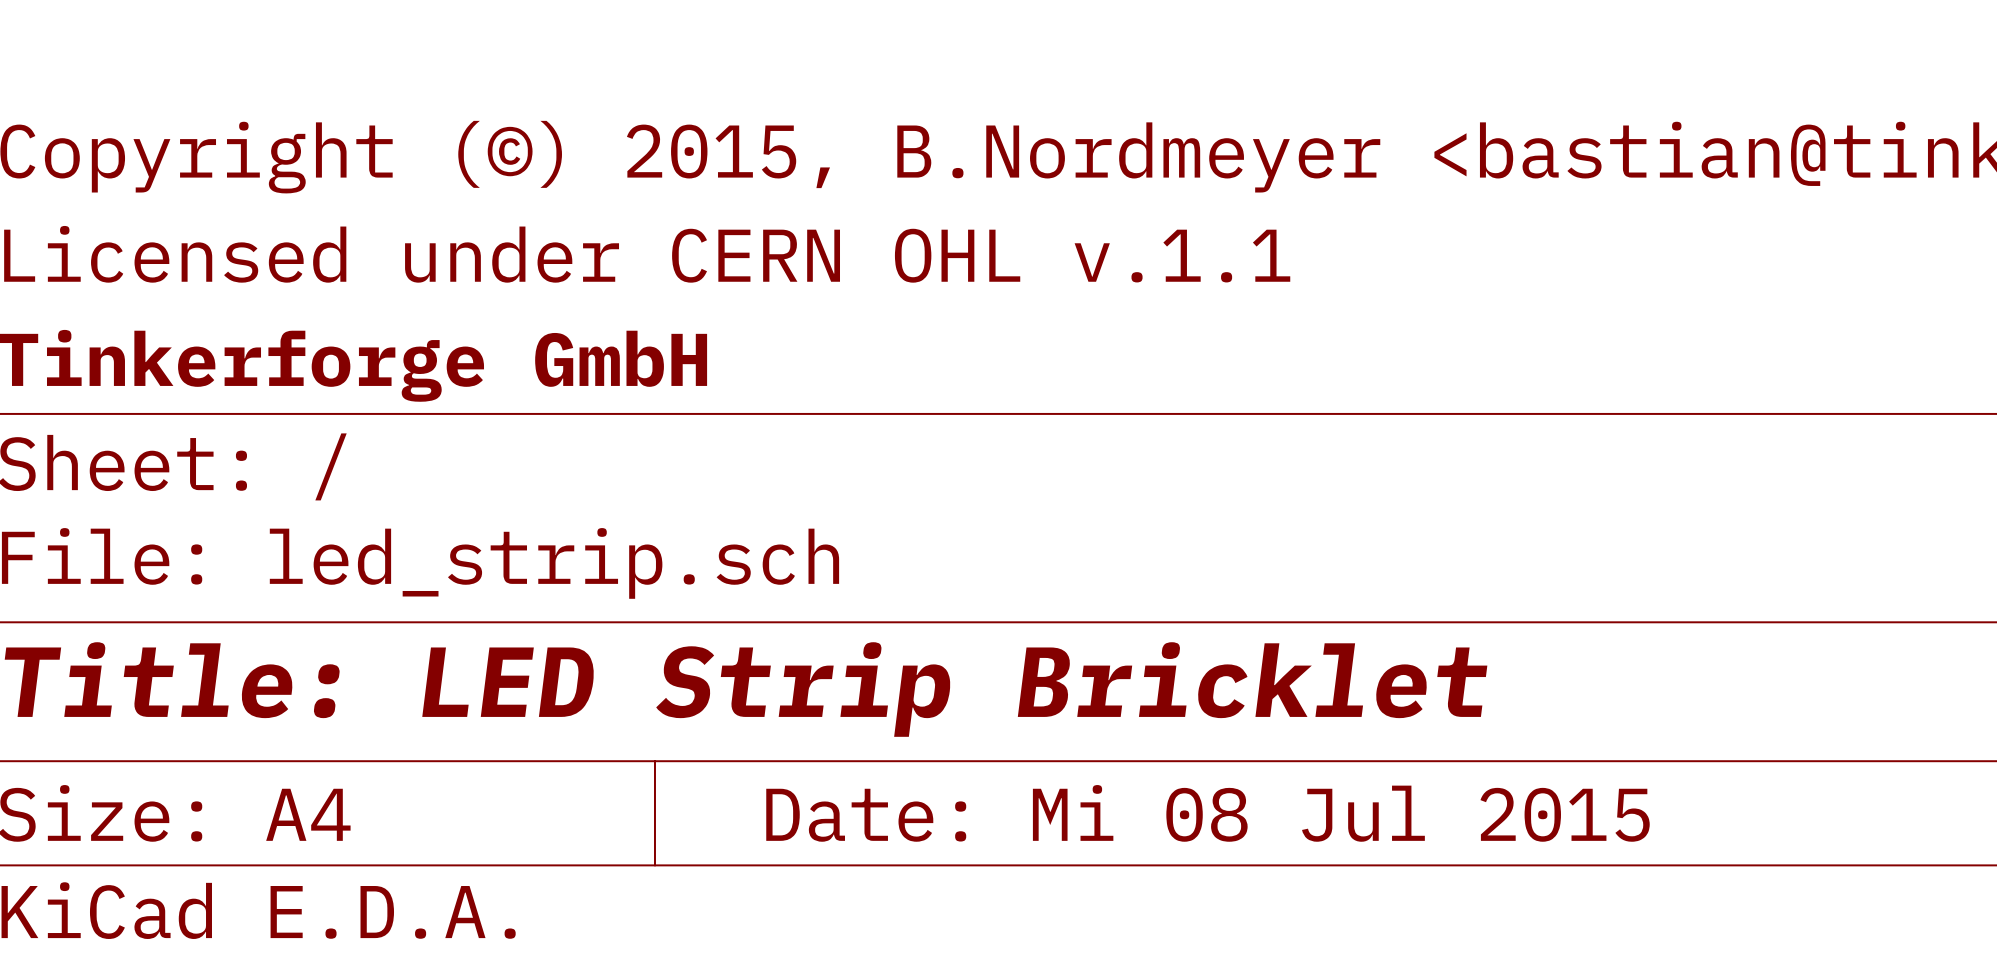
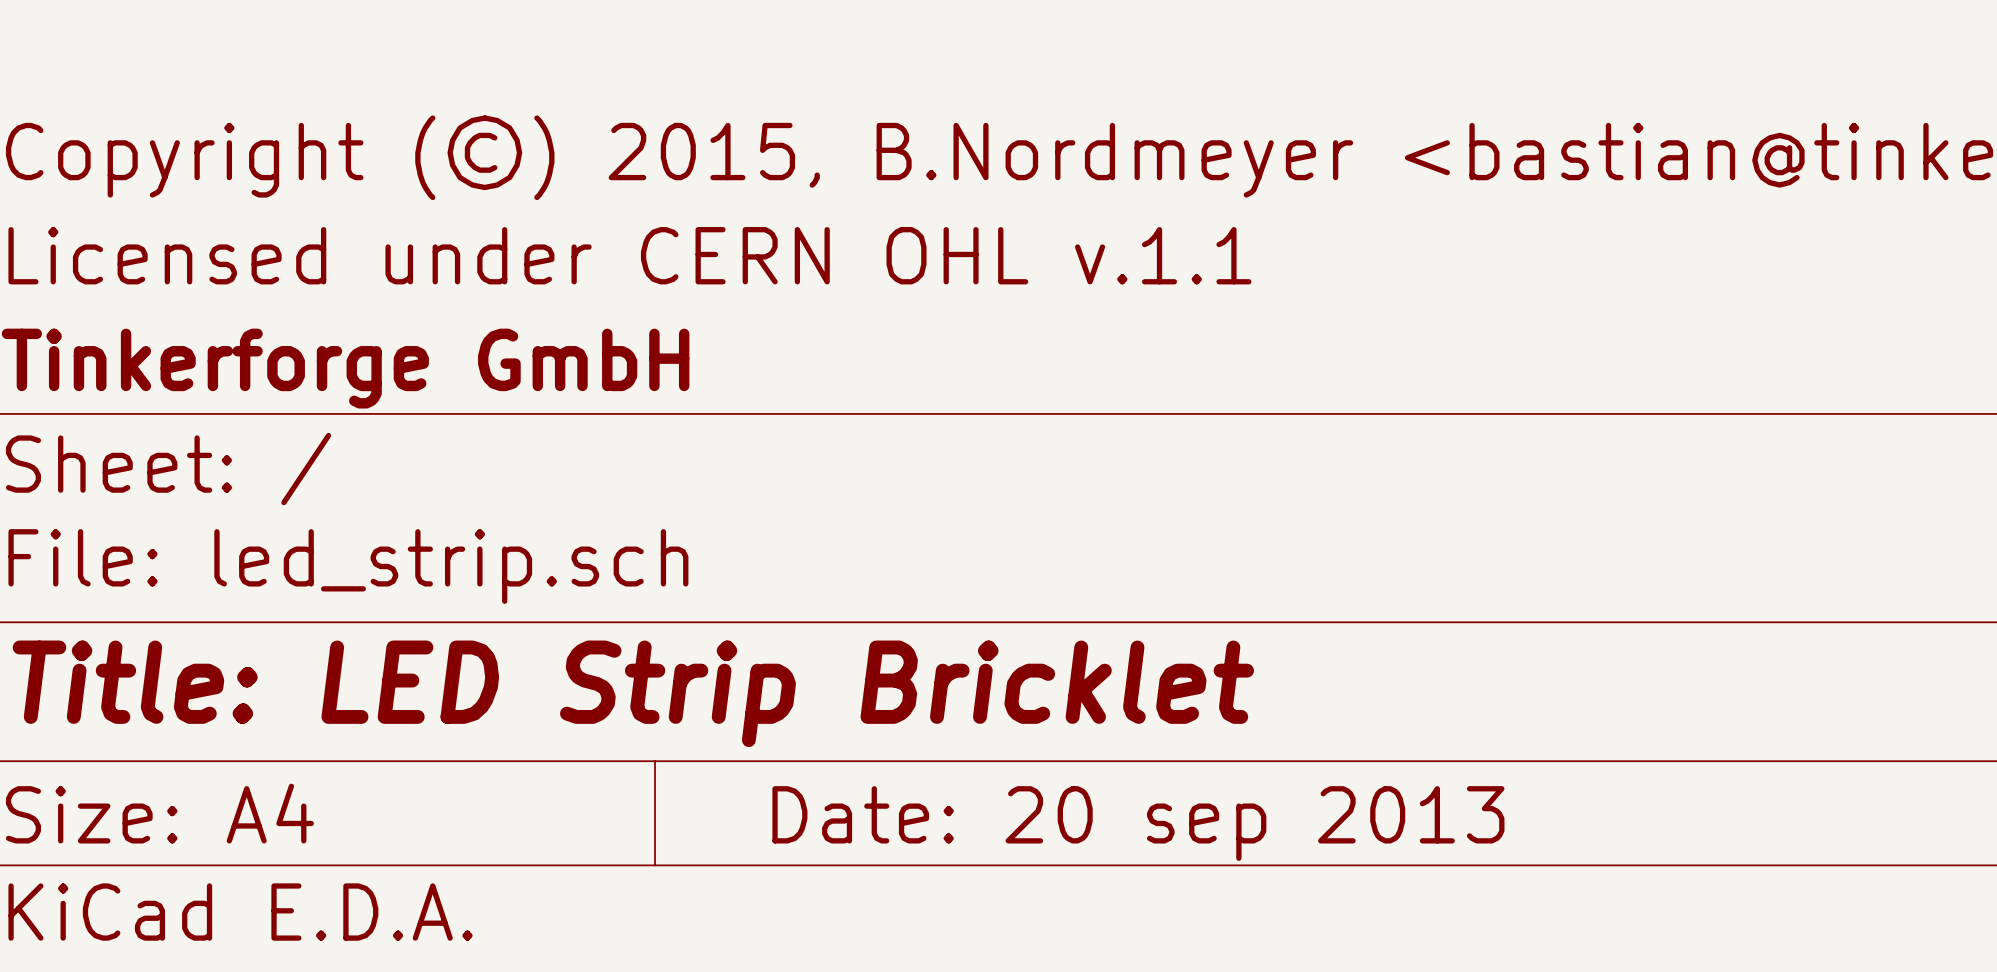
title block: Date: Mi 08 Jul 2015 (1207, 813) -> Date: 20 sep 2013 (1138, 823)

